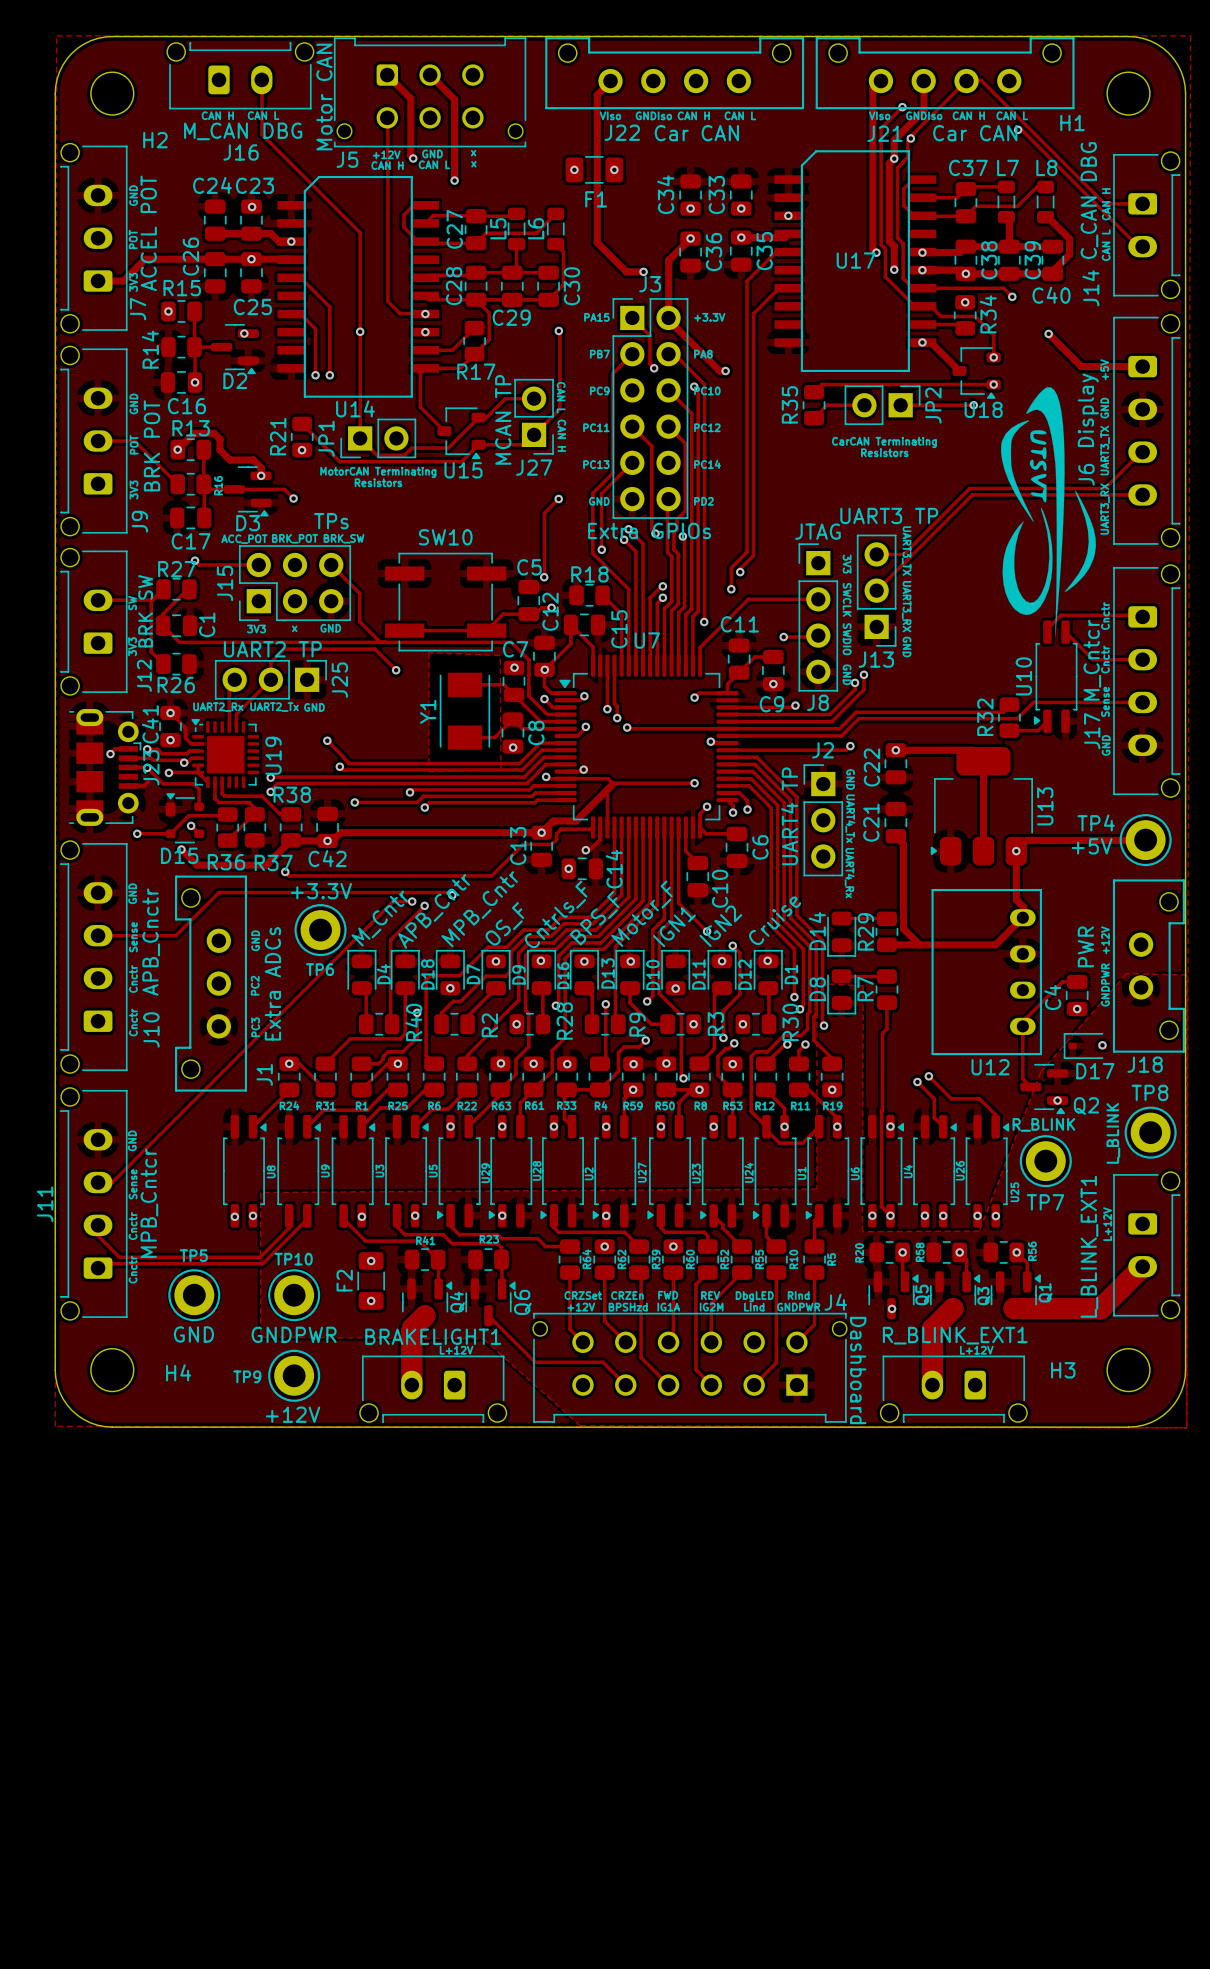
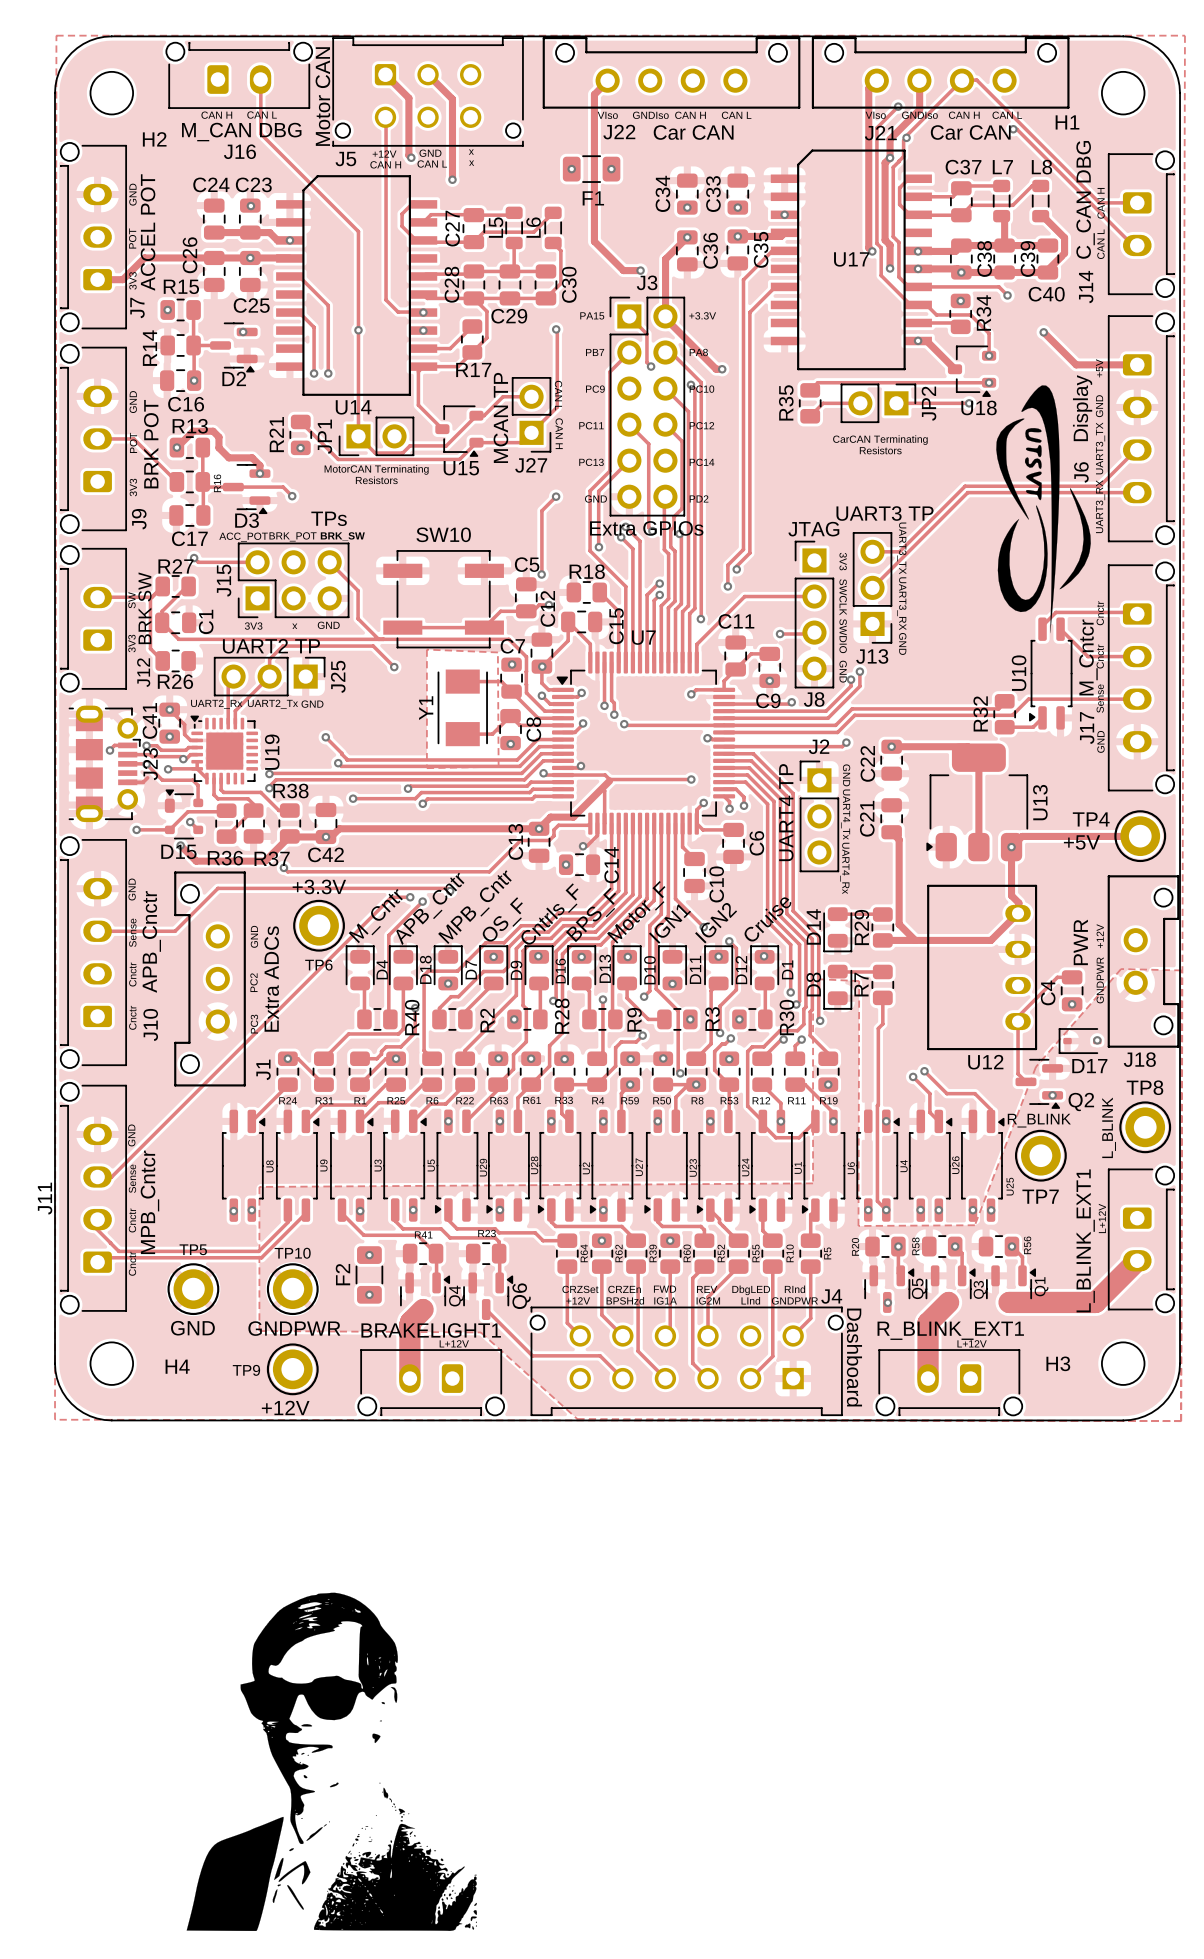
drawing: none -> [186, 1592, 477, 1931]

